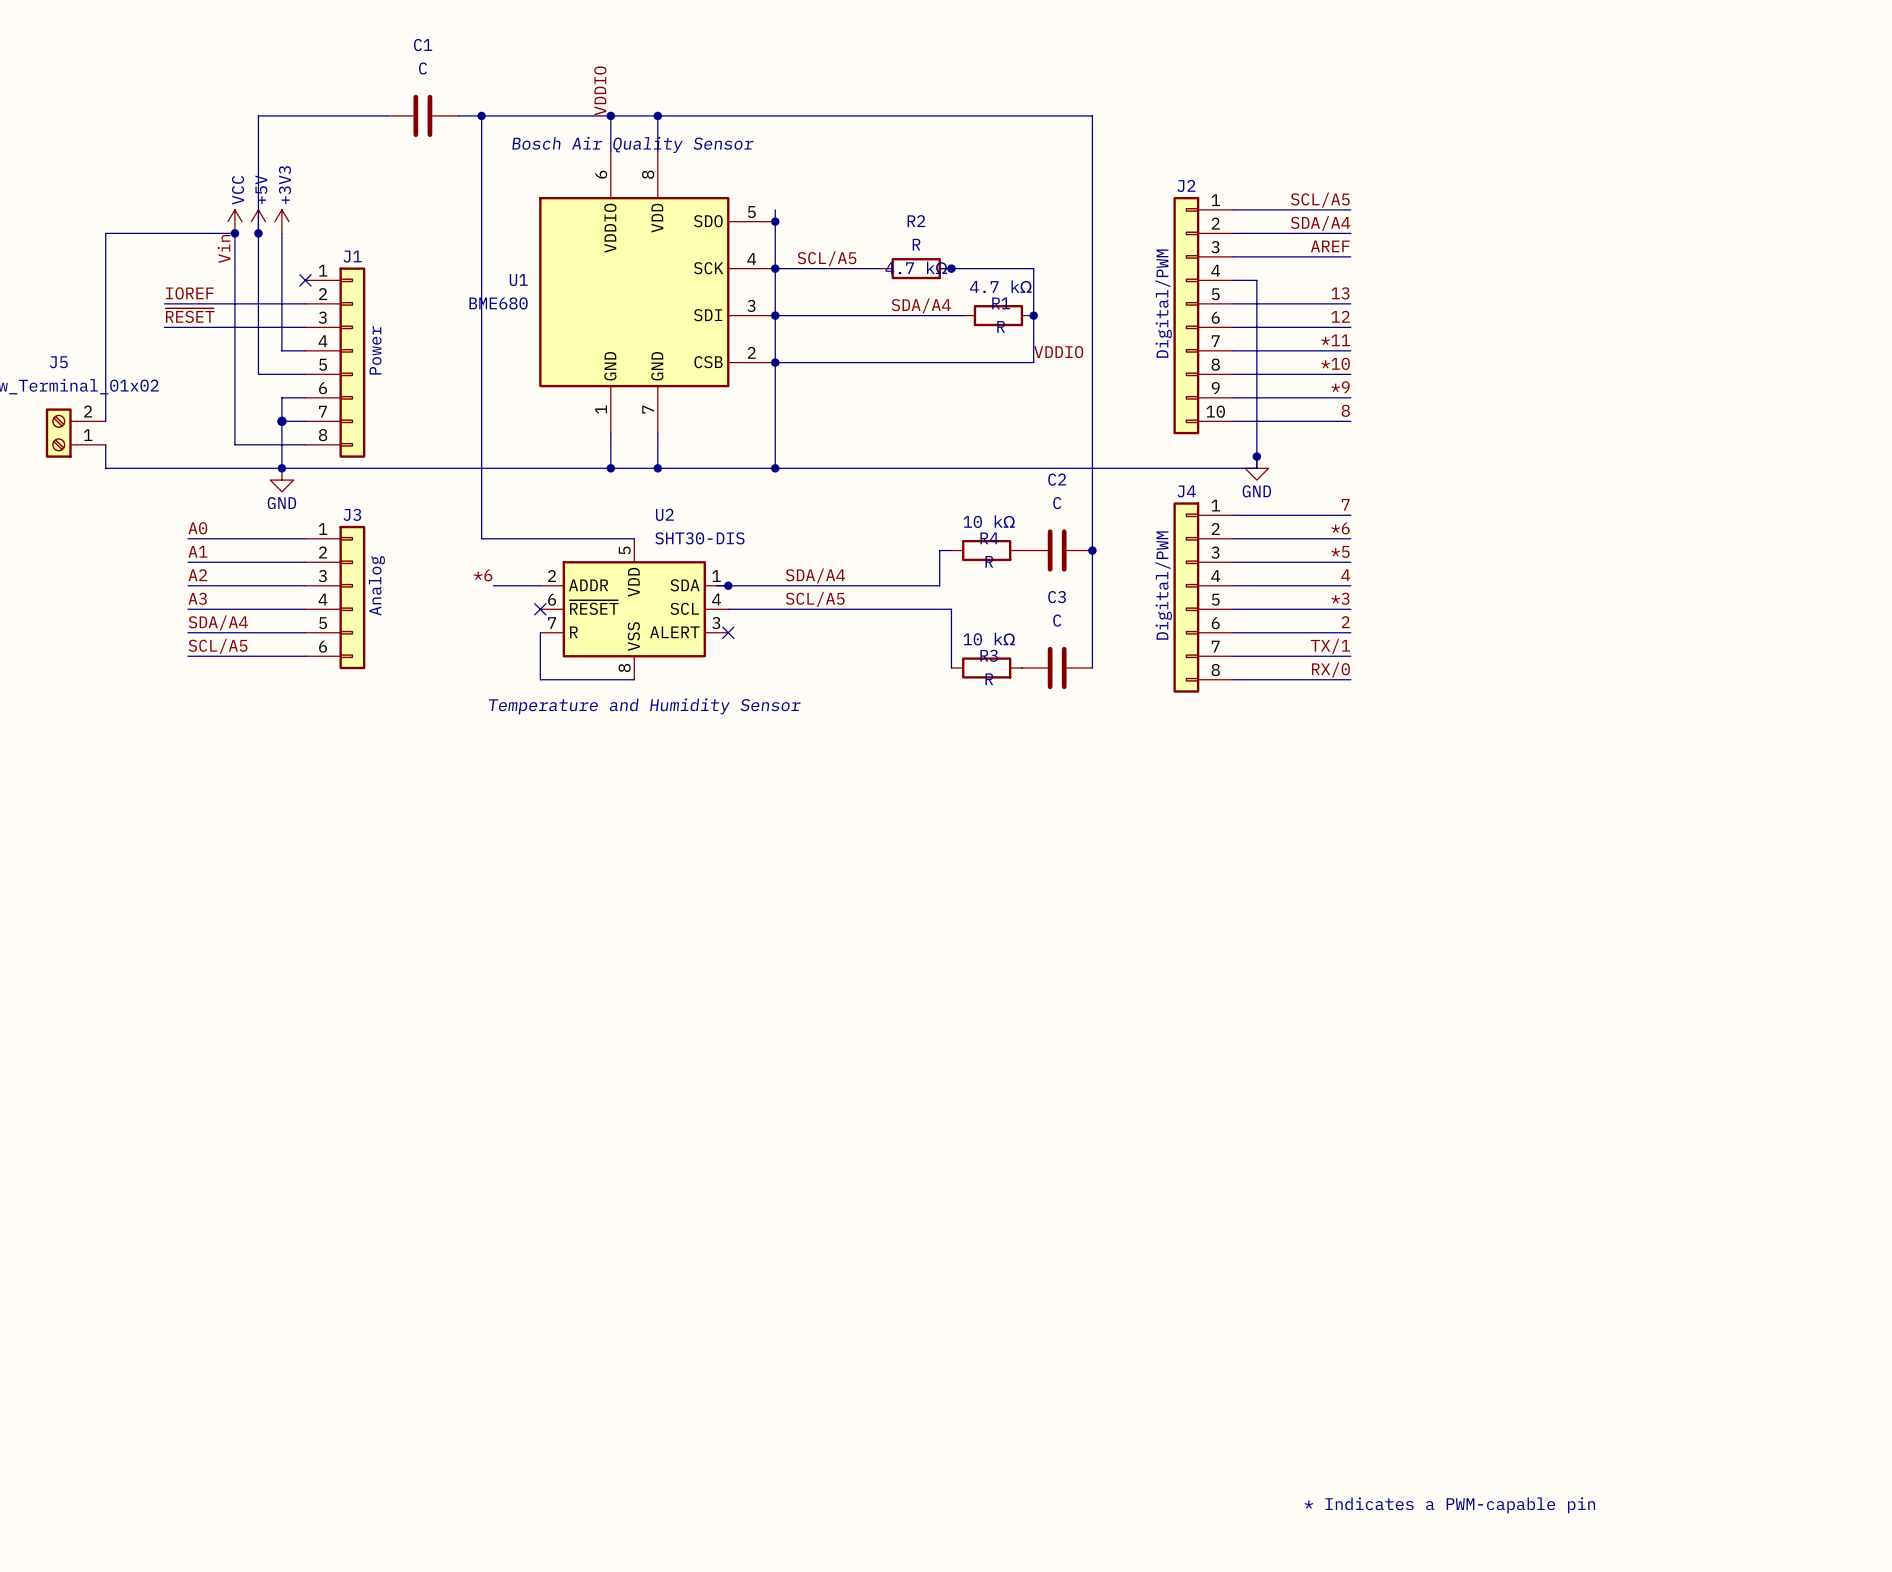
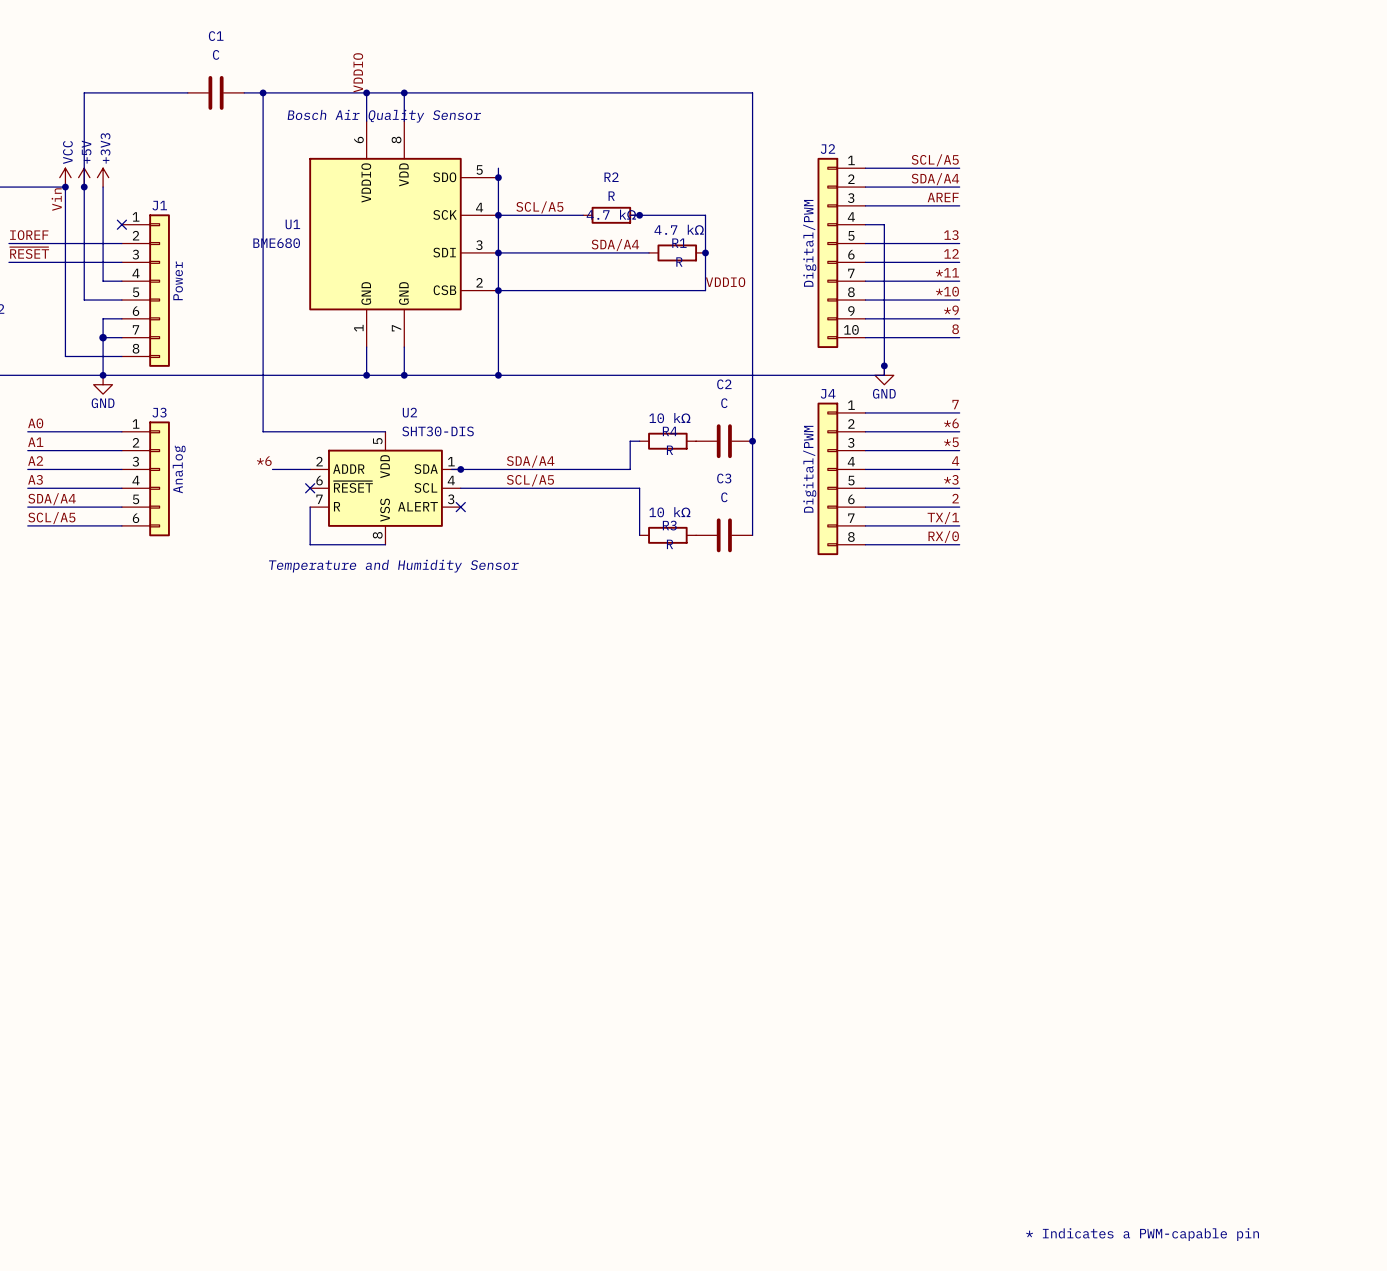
text position: * Indicates a PWM-capable pin (1449, 1505) -> * Indicates a PWM-capable pin (1142, 1234)

